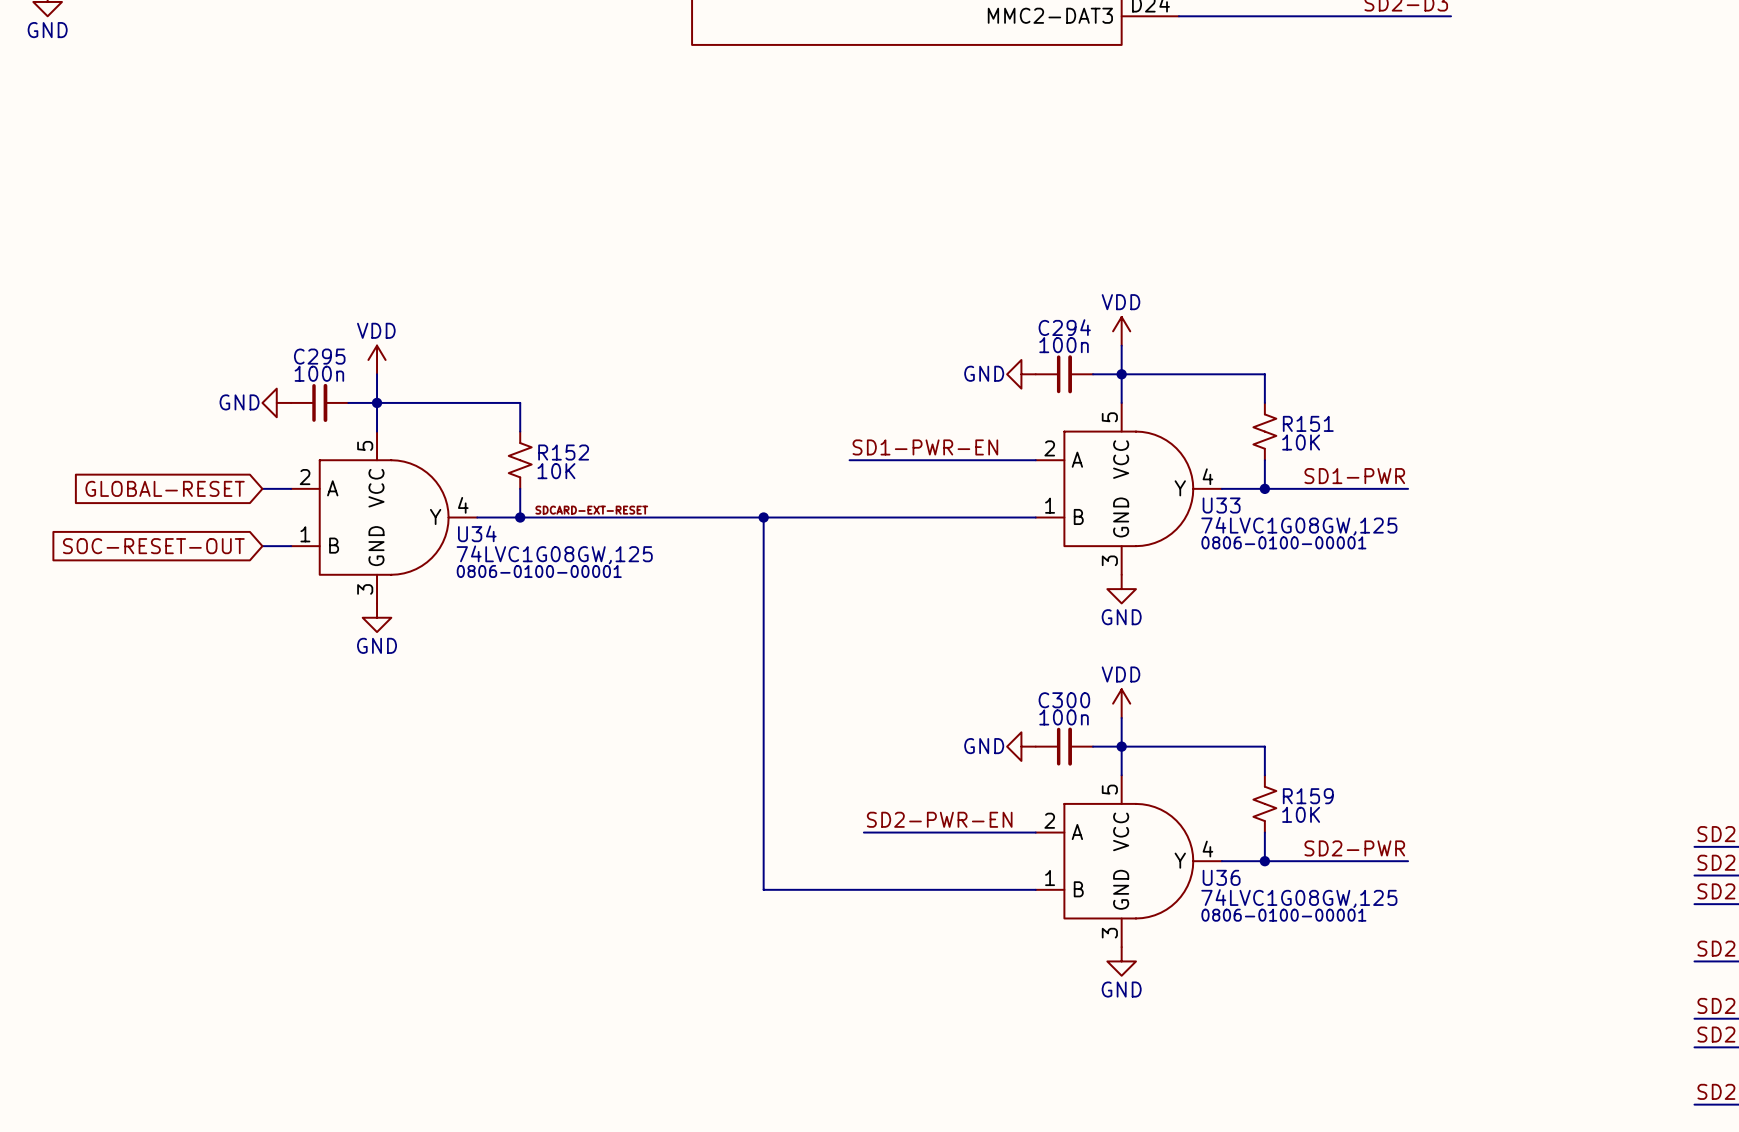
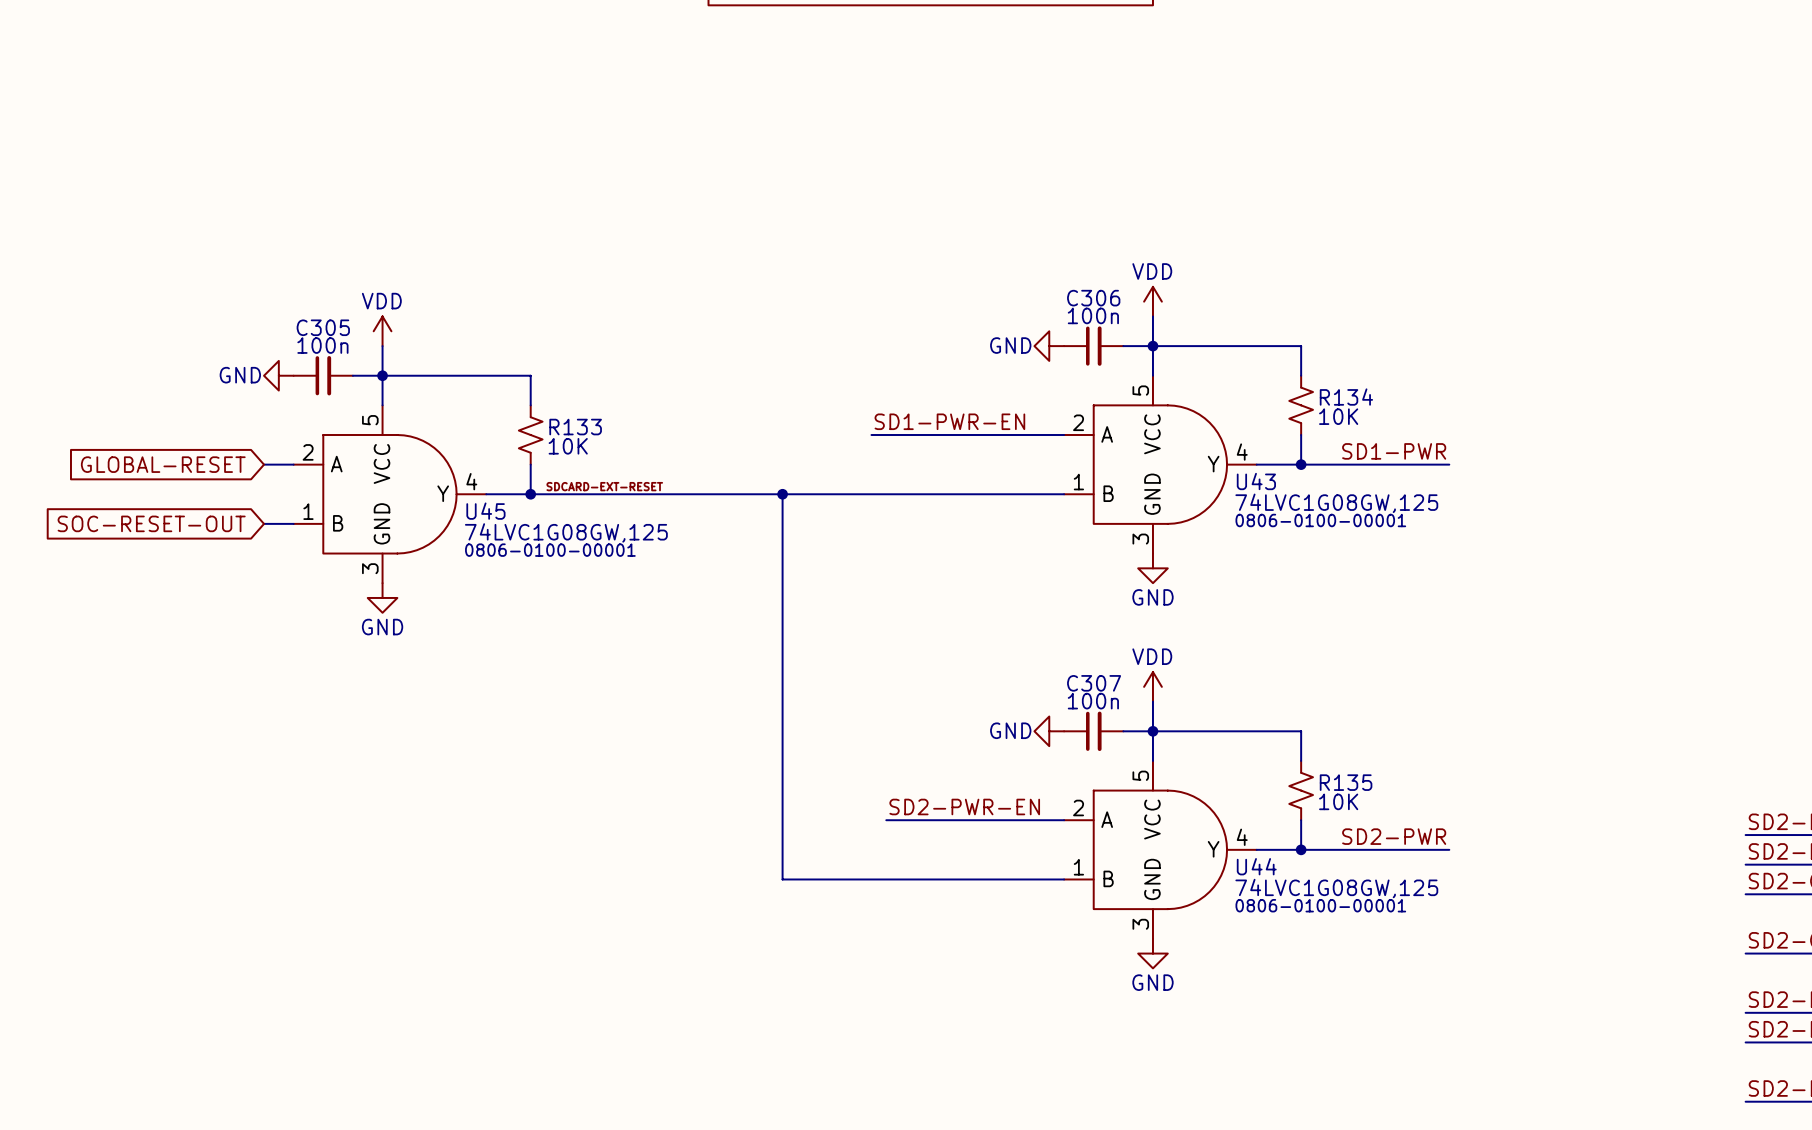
C294 name: C294 (1064, 327) -> C306 (1093, 298)
C295 name: C295 (319, 356) -> C305 (323, 327)
R151 name: R151 (1308, 423) -> R134 (1346, 397)
R152 name: R152 (563, 452) -> R133 (575, 427)
U33 name: U33 (1221, 505) -> U43 (1256, 481)
U34 name: U34 (477, 533) -> U45 (485, 511)
C300 name: C300 (1064, 700) -> C307 (1094, 683)
R159 name: R159 (1308, 796) -> R135 (1346, 782)
U36 name: U36 (1221, 877) -> U44 (1256, 866)

